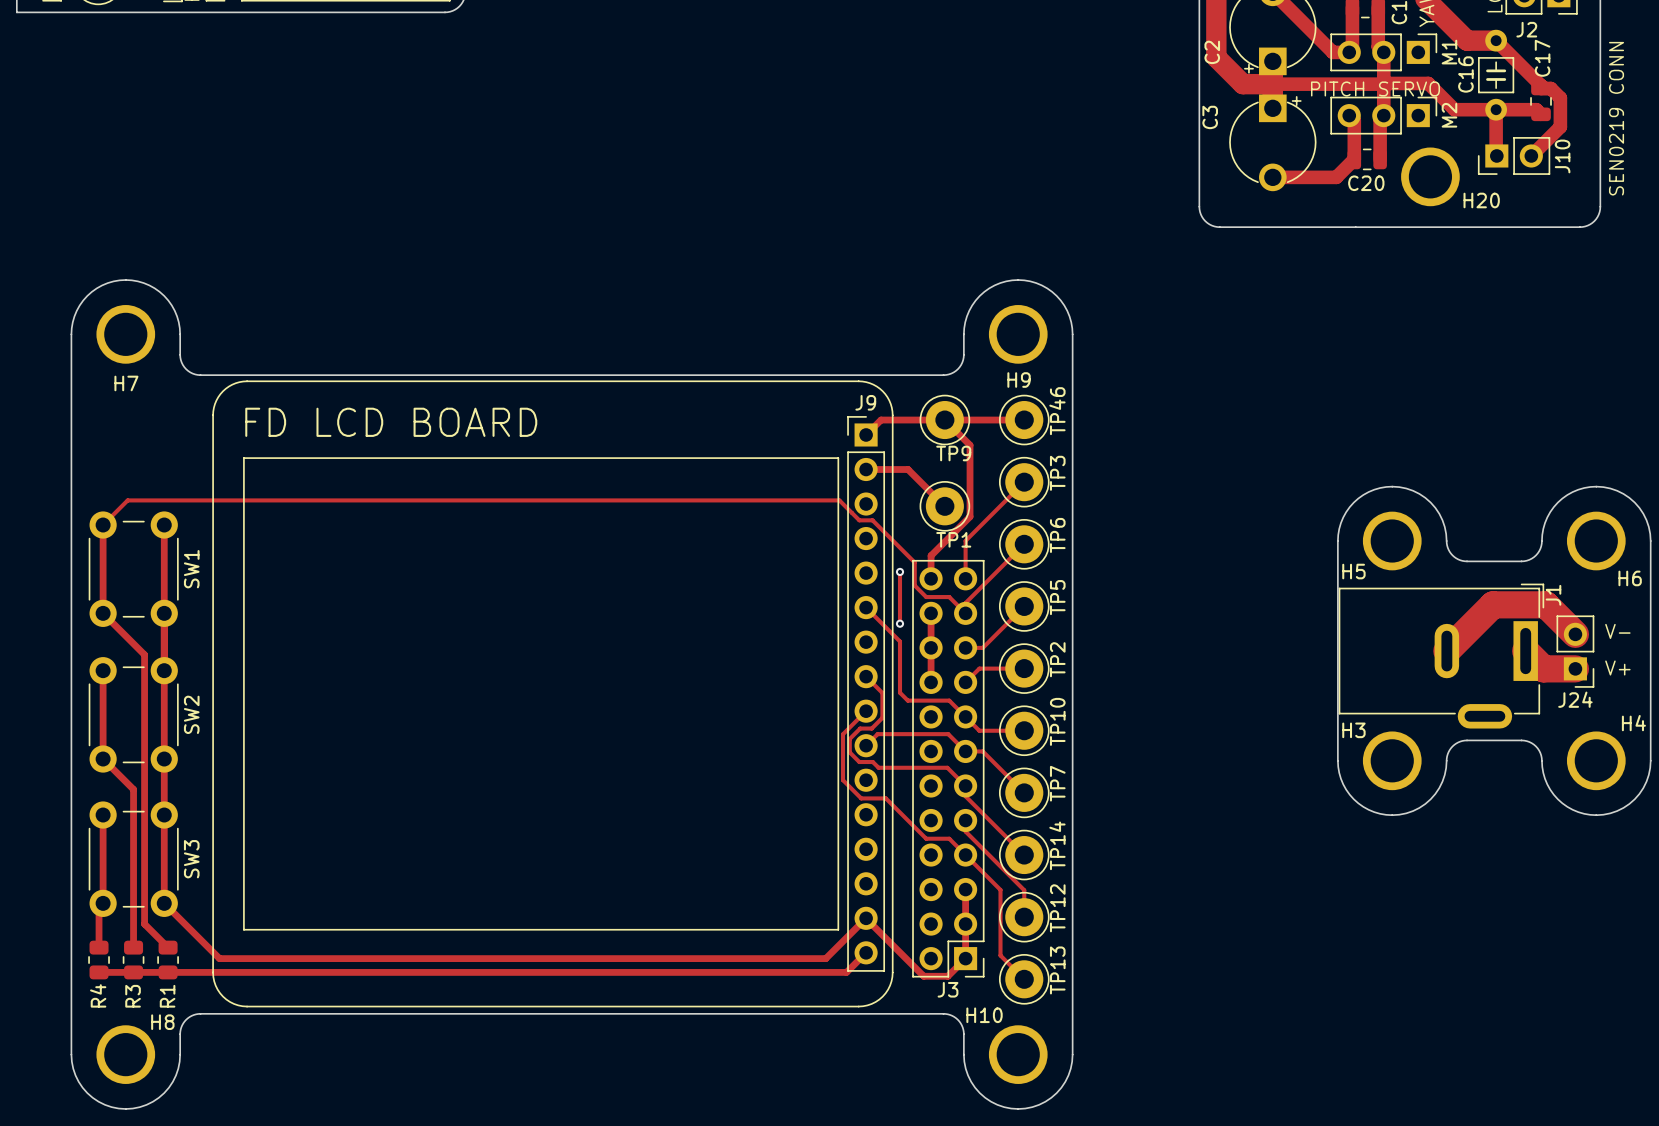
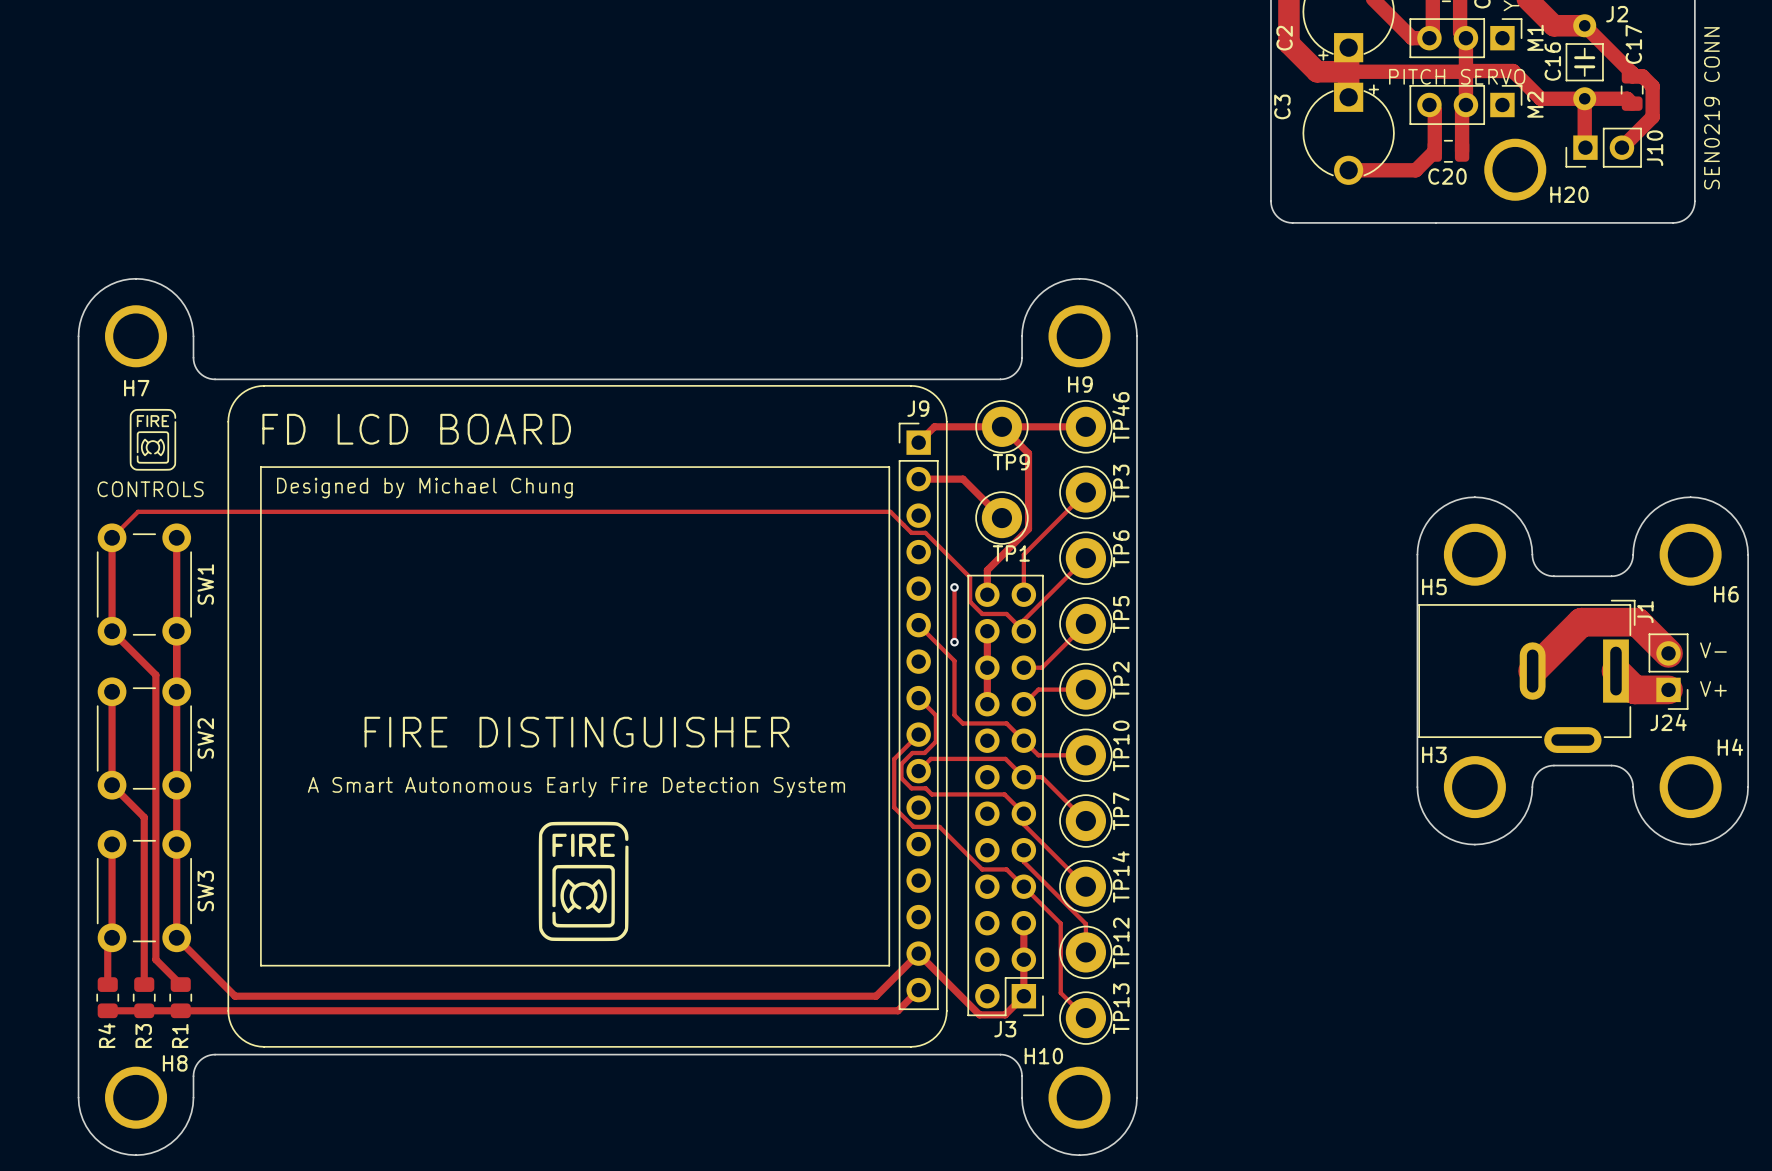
drawing: none -> [129, 408, 177, 471]
text: none -> Designed by Michael Chung (424, 488)
text: none -> CONTROLS (150, 489)
text: none -> FIRE DISTINGUISHER (577, 732)
text: none -> A Smart Autonomous Early Fire Detection System (576, 787)
drawing: none -> [538, 821, 629, 942]

